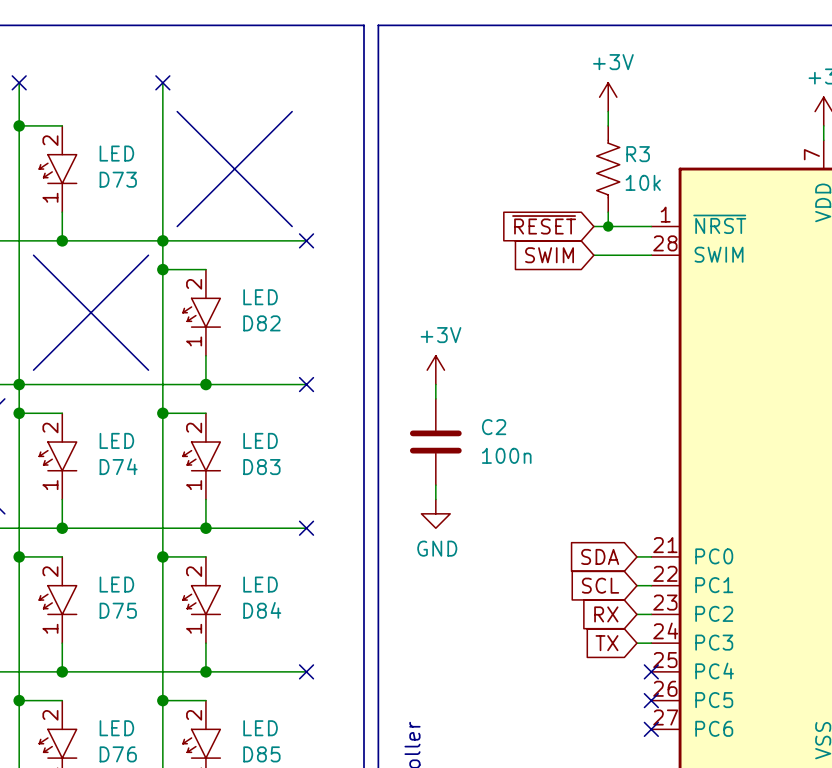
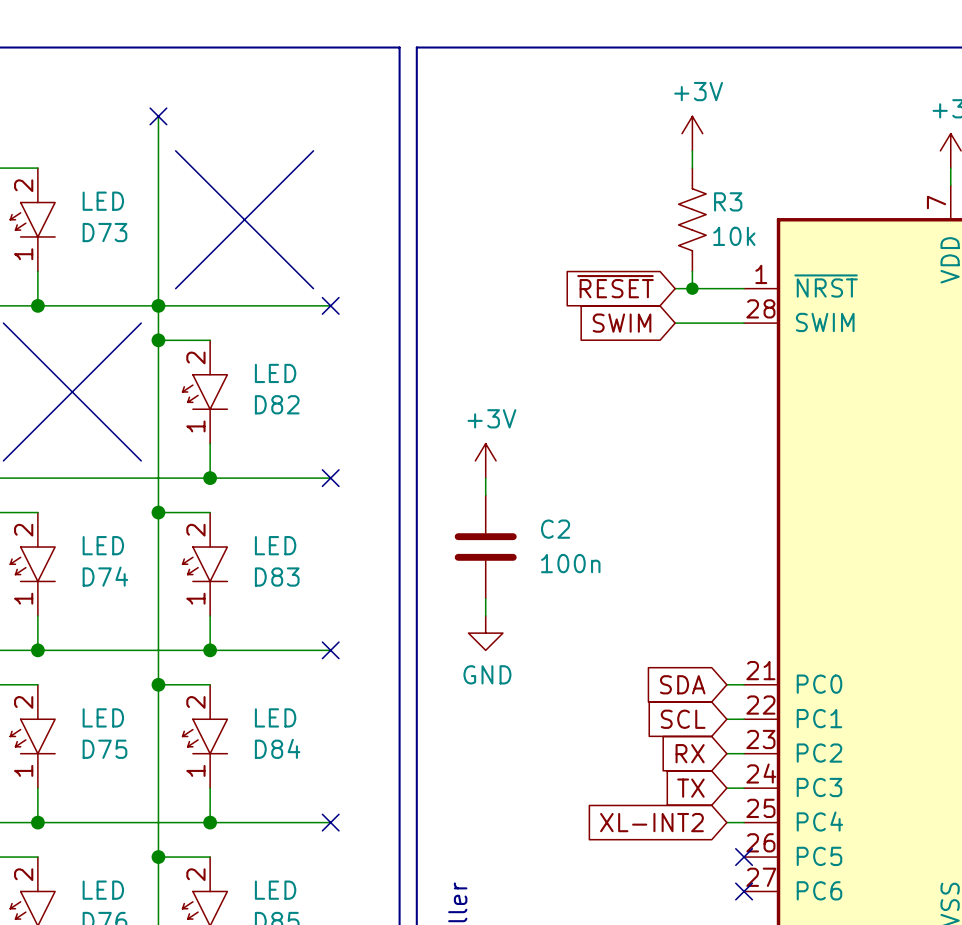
global label: none -> XL-INT2 (651, 822)
wire: none -> (726, 822) (744, 822)
no-connect mark: (651, 671) -> none

